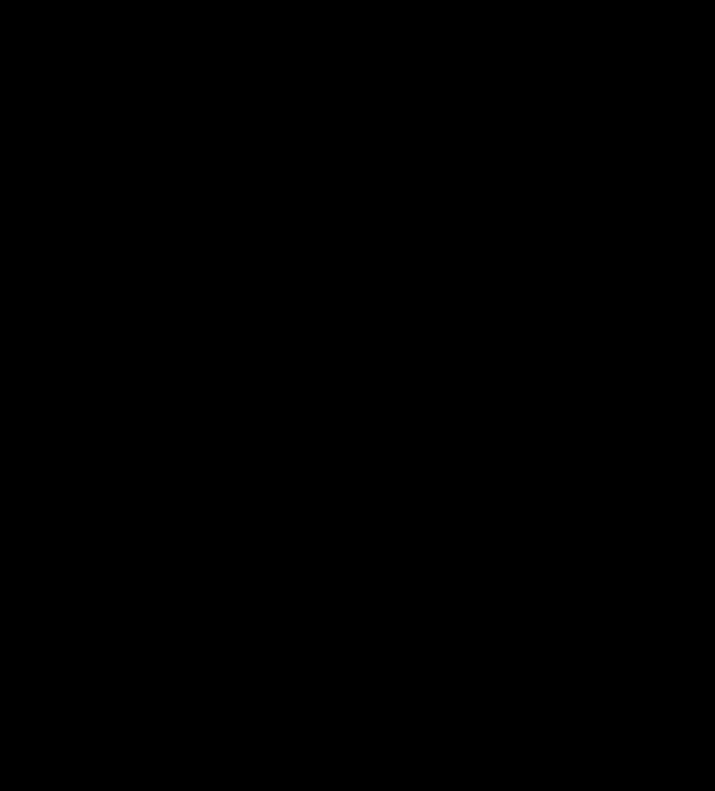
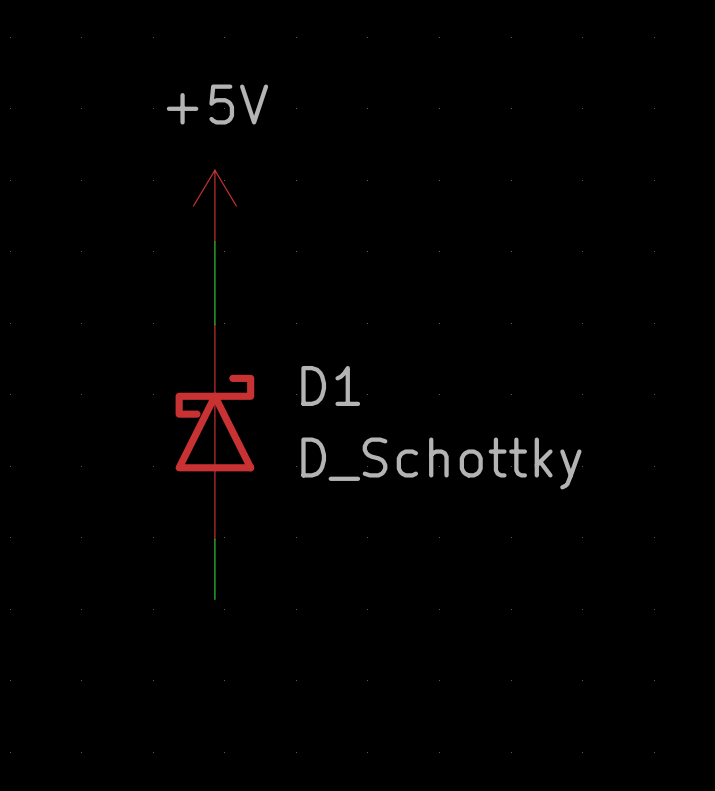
power symbol: none -> +5V (214, 206)
wire: none -> (214, 241) (214, 324)
D1: none -> D_Schottky (214, 432)
wire: none -> (214, 539) (214, 599)

